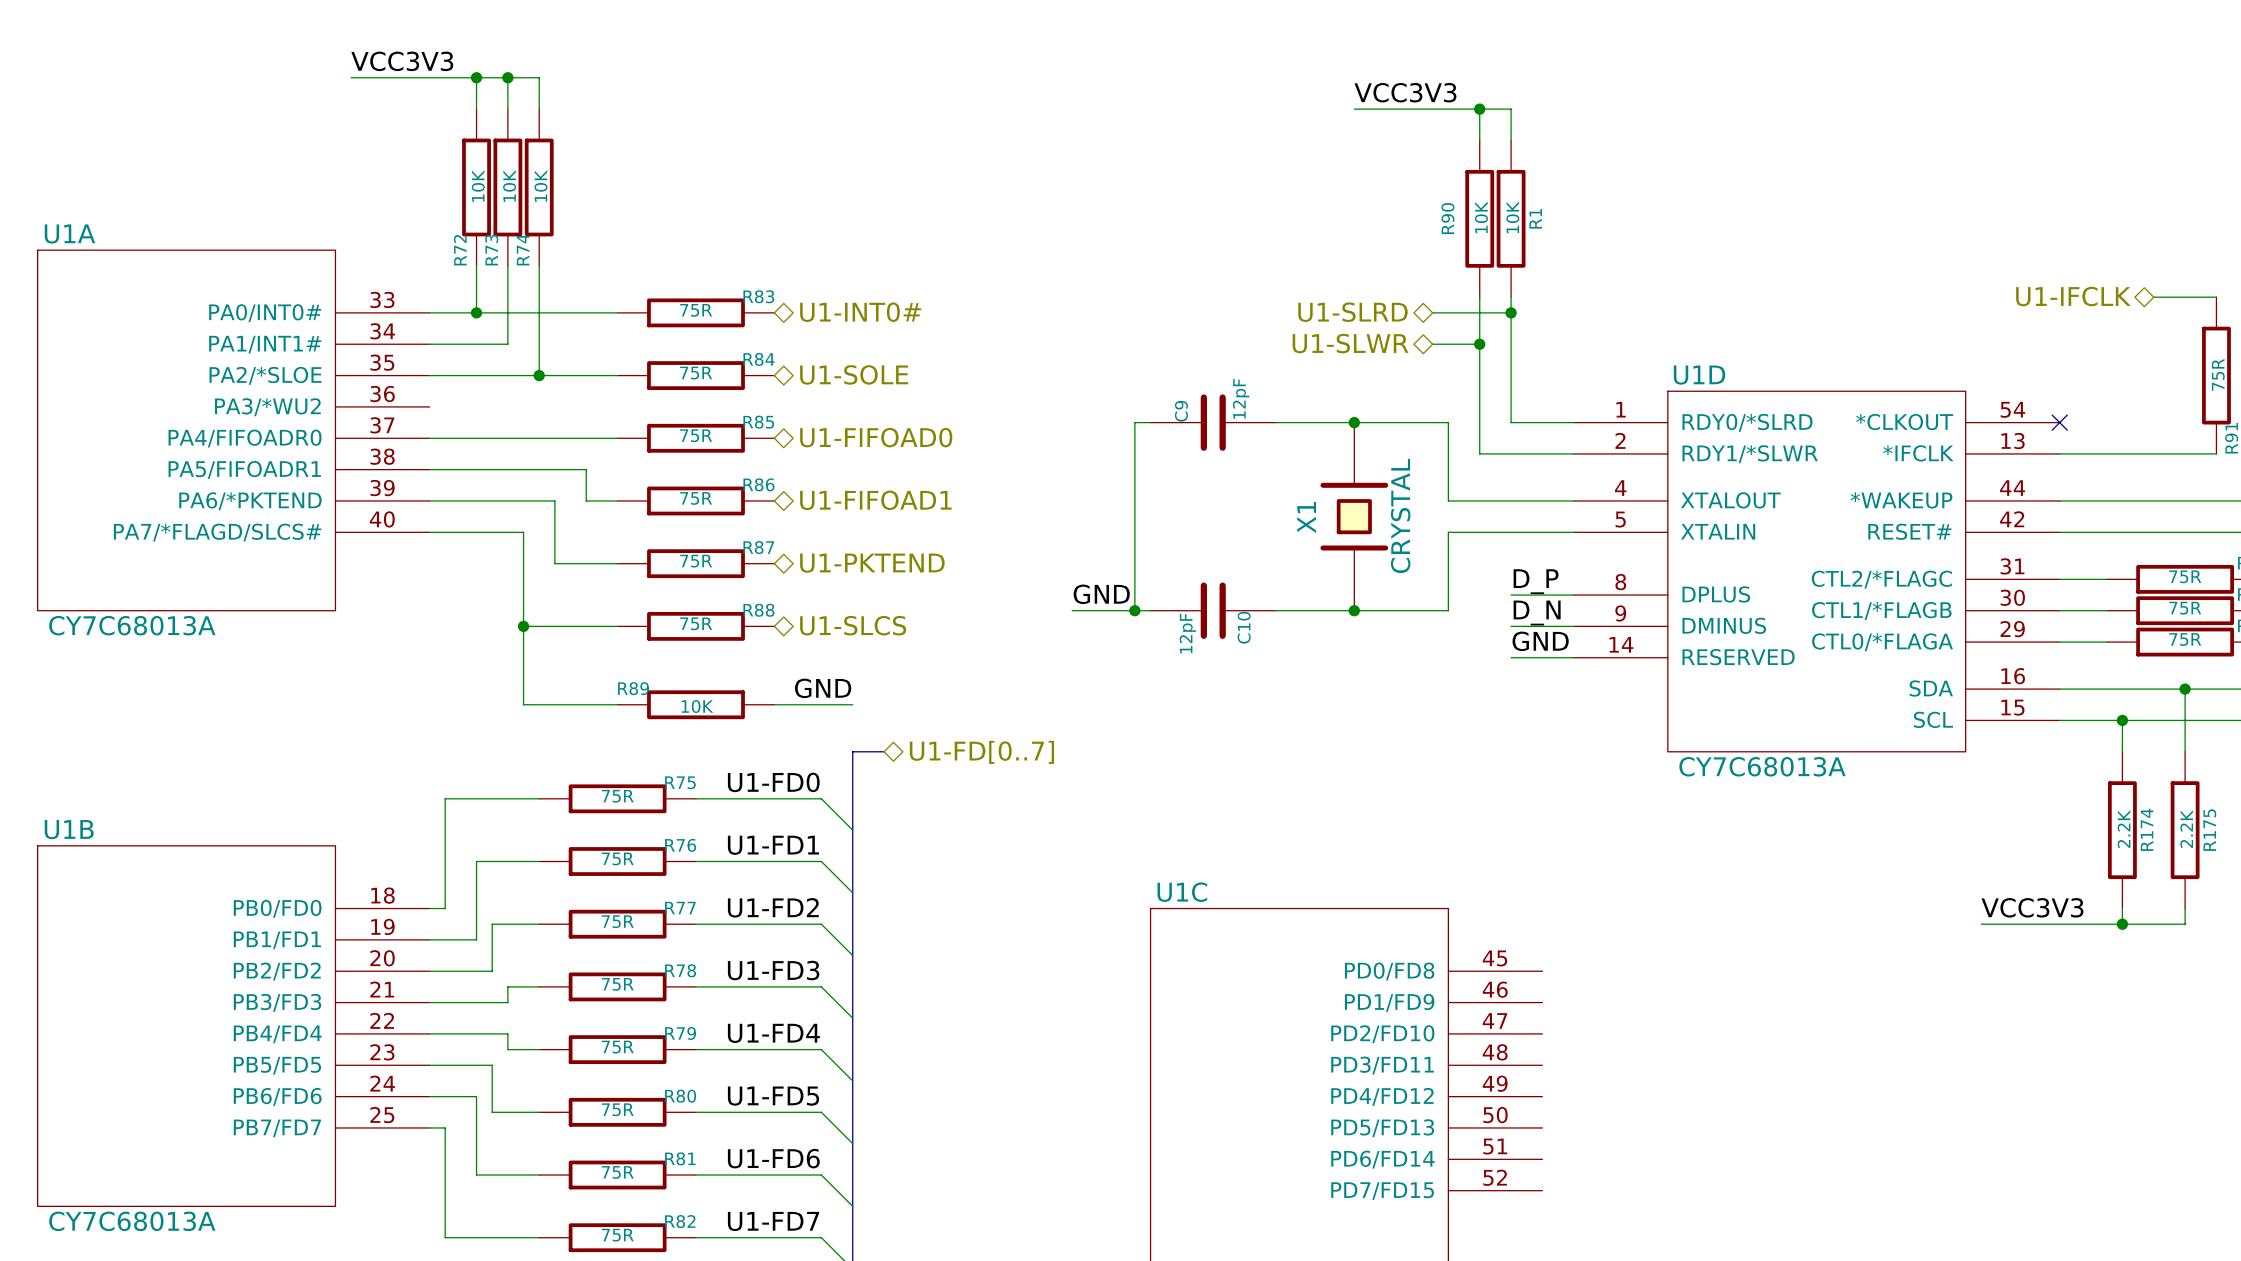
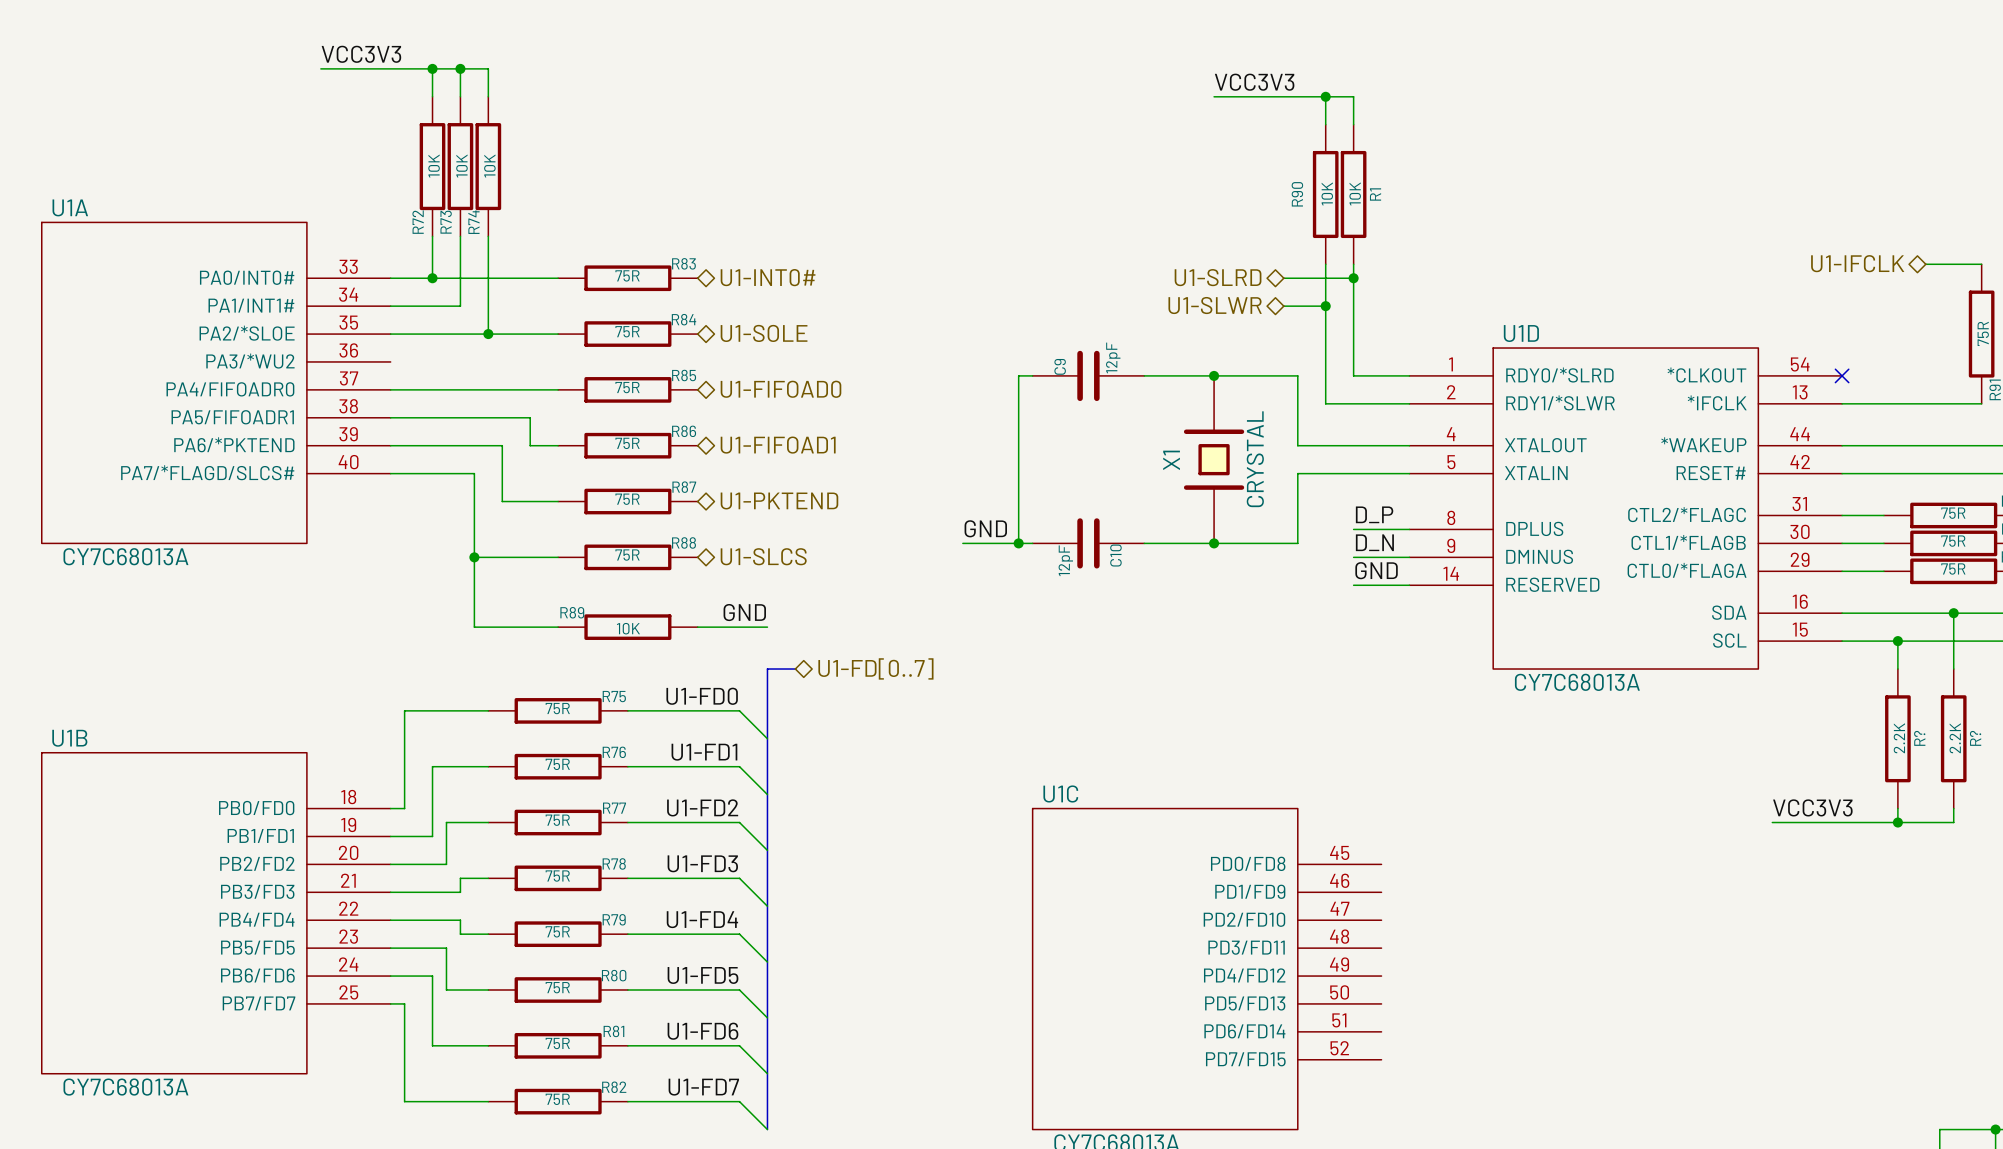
R174 name: R174 (2147, 829) -> R? (1919, 738)
R175 name: R175 (2209, 830) -> R? (1975, 738)

